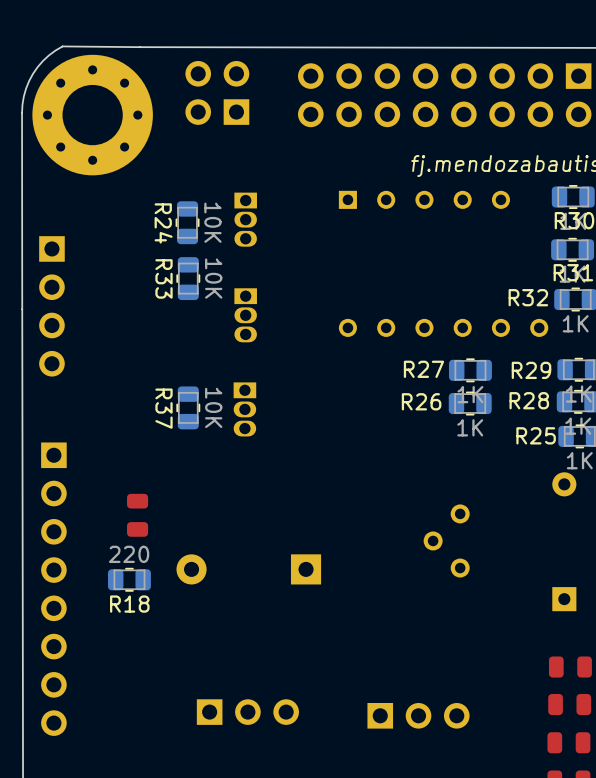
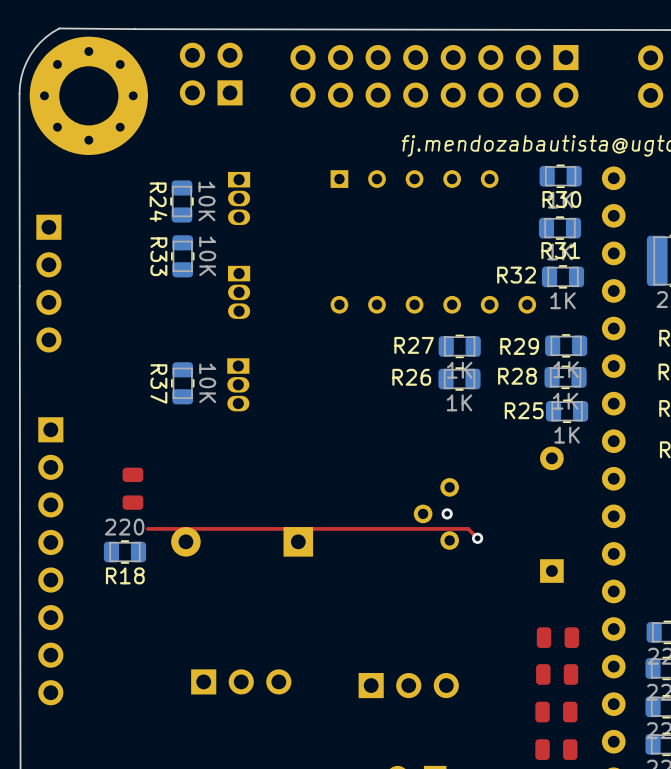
via: none -> (447, 513)
top track: none -> (147, 528) (468, 528) (477, 538)
via: none -> (477, 538)

